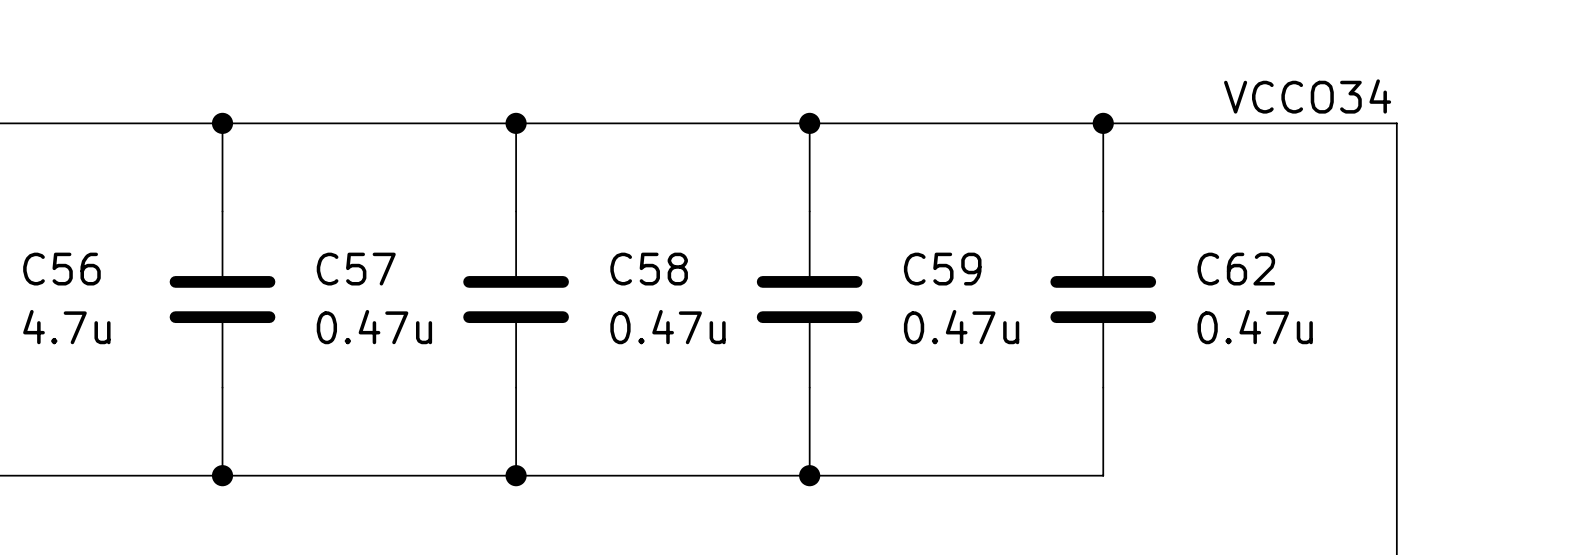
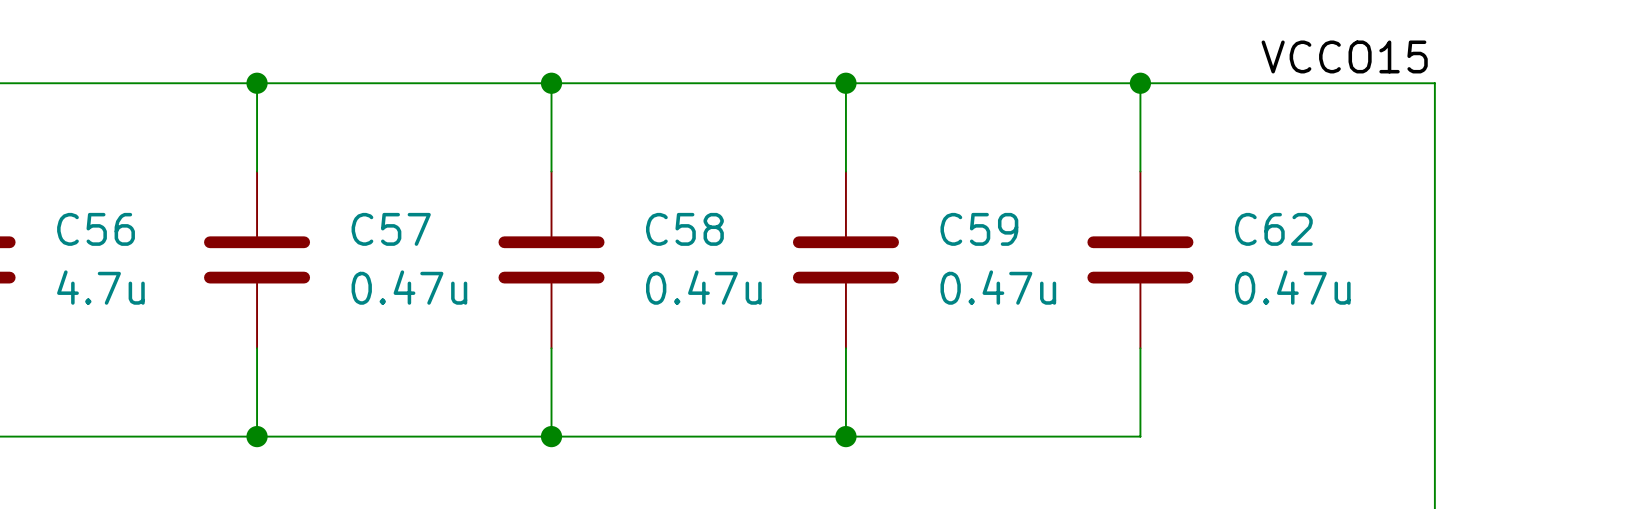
label: VCCO34 (1307, 96) -> VCCO15 (1344, 56)

